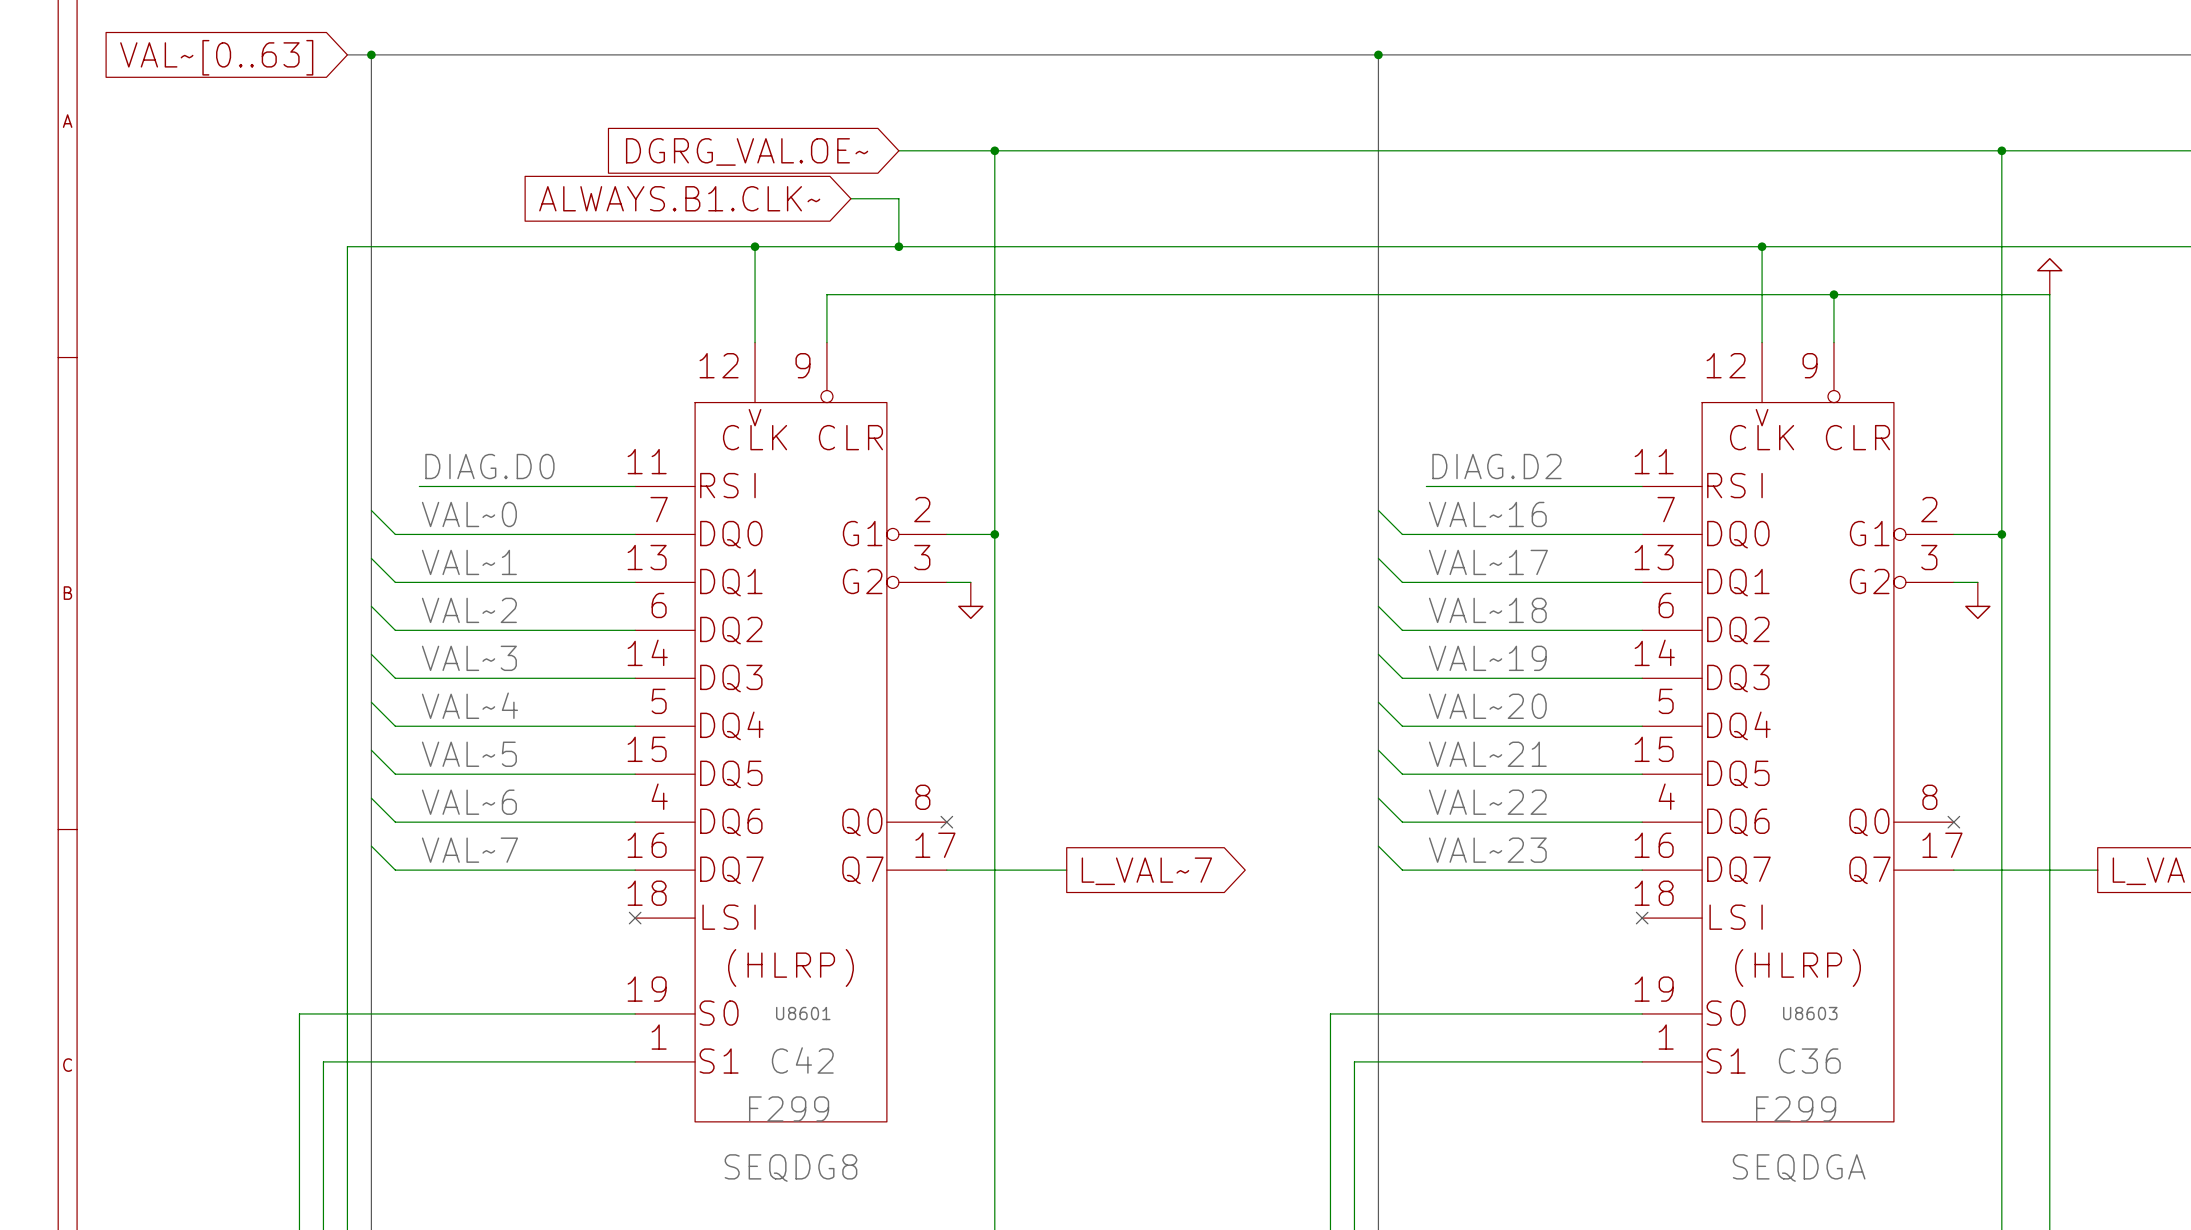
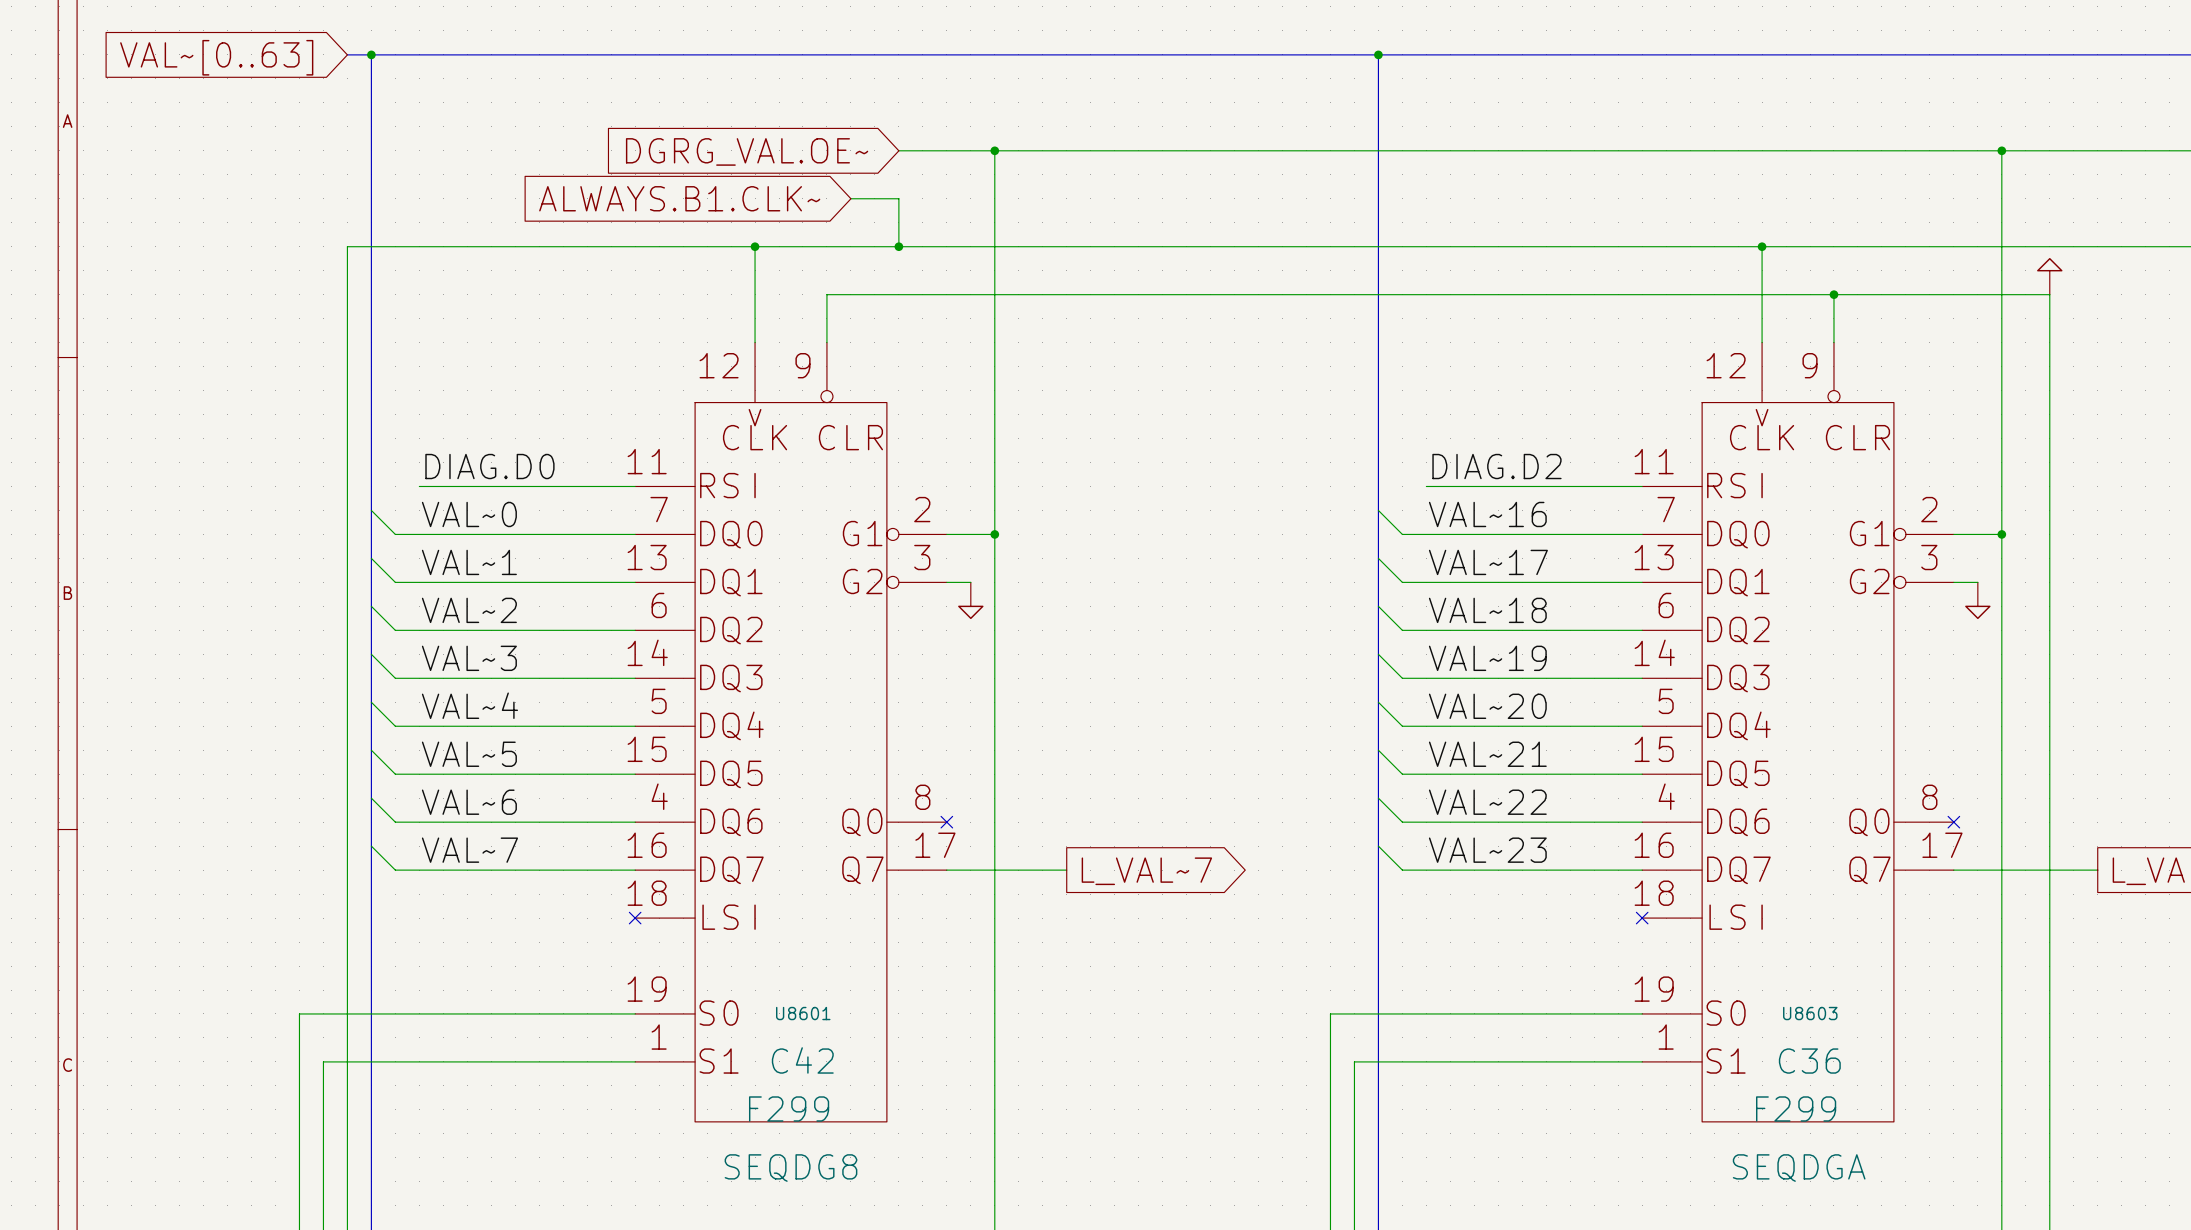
U8601 text: H (755, 965) -> none
U8601 text: L (780, 965) -> none
U8601 text: R (803, 965) -> none
U8601 text: P (827, 965) -> none
U8603 text: H (1762, 965) -> none
U8603 text: L (1787, 965) -> none
U8603 text: R (1810, 965) -> none
U8603 text: P (1834, 965) -> none
U8601 text: ( (732, 967) -> none
U8601 text: ) (849, 967) -> none
U8603 text: ( (1739, 967) -> none
U8603 text: ) (1856, 967) -> none

